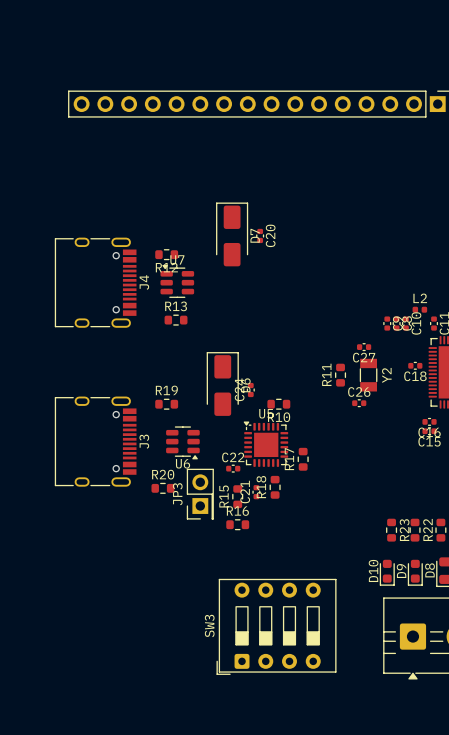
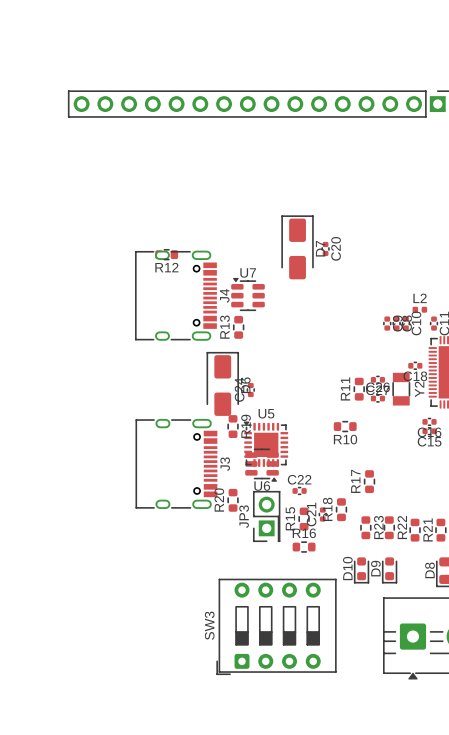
D7 position: (232, 234) -> (297, 247)
C20 position: (260, 235) -> (325, 248)
U7 position: (177, 281) -> (248, 294)
J4 position: (95, 282) -> (176, 295)
R13 name position: R13 (176, 306) -> R13 (224, 327)
R13 rotation: 0° (176, 320) -> 90° clockwise (238, 327)
R13 position: (176, 320) -> (238, 327)
C27 position: (364, 347) -> (377, 379)
R11 position: (340, 375) -> (359, 389)
Y2 position: (368, 375) -> (401, 389)
C26 position: (359, 403) -> (377, 398)
R19 rotation: 0° (166, 404) -> 90° clockwise (233, 426)
R19 position: (166, 404) -> (233, 426)
R10 position: (278, 404) -> (345, 426)
J3 position: (95, 441) -> (176, 463)
U6 position: (182, 442) -> (262, 465)
R17 position: (303, 459) -> (369, 481)
C22 position: (233, 468) -> (299, 490)
R20 name position: R20 (163, 474) -> R20 (219, 500)
R18 position: (275, 487) -> (341, 509)
R20 rotation: 0° (162, 488) -> 90° clockwise (233, 500)
R20 position: (162, 488) -> (233, 500)
C21 position: (256, 492) -> (322, 514)
JP3 position: (200, 494) -> (266, 516)
R15 position: (237, 496) -> (304, 519)
R16 position: (237, 524) -> (304, 547)
R22: none -> (389, 527)
R22 name: R22 (427, 529) -> R21 (427, 529)
R23 position: (391, 530) -> (365, 527)
D10 position: (387, 572) -> (361, 570)
D9 position: (415, 572) -> (389, 570)

